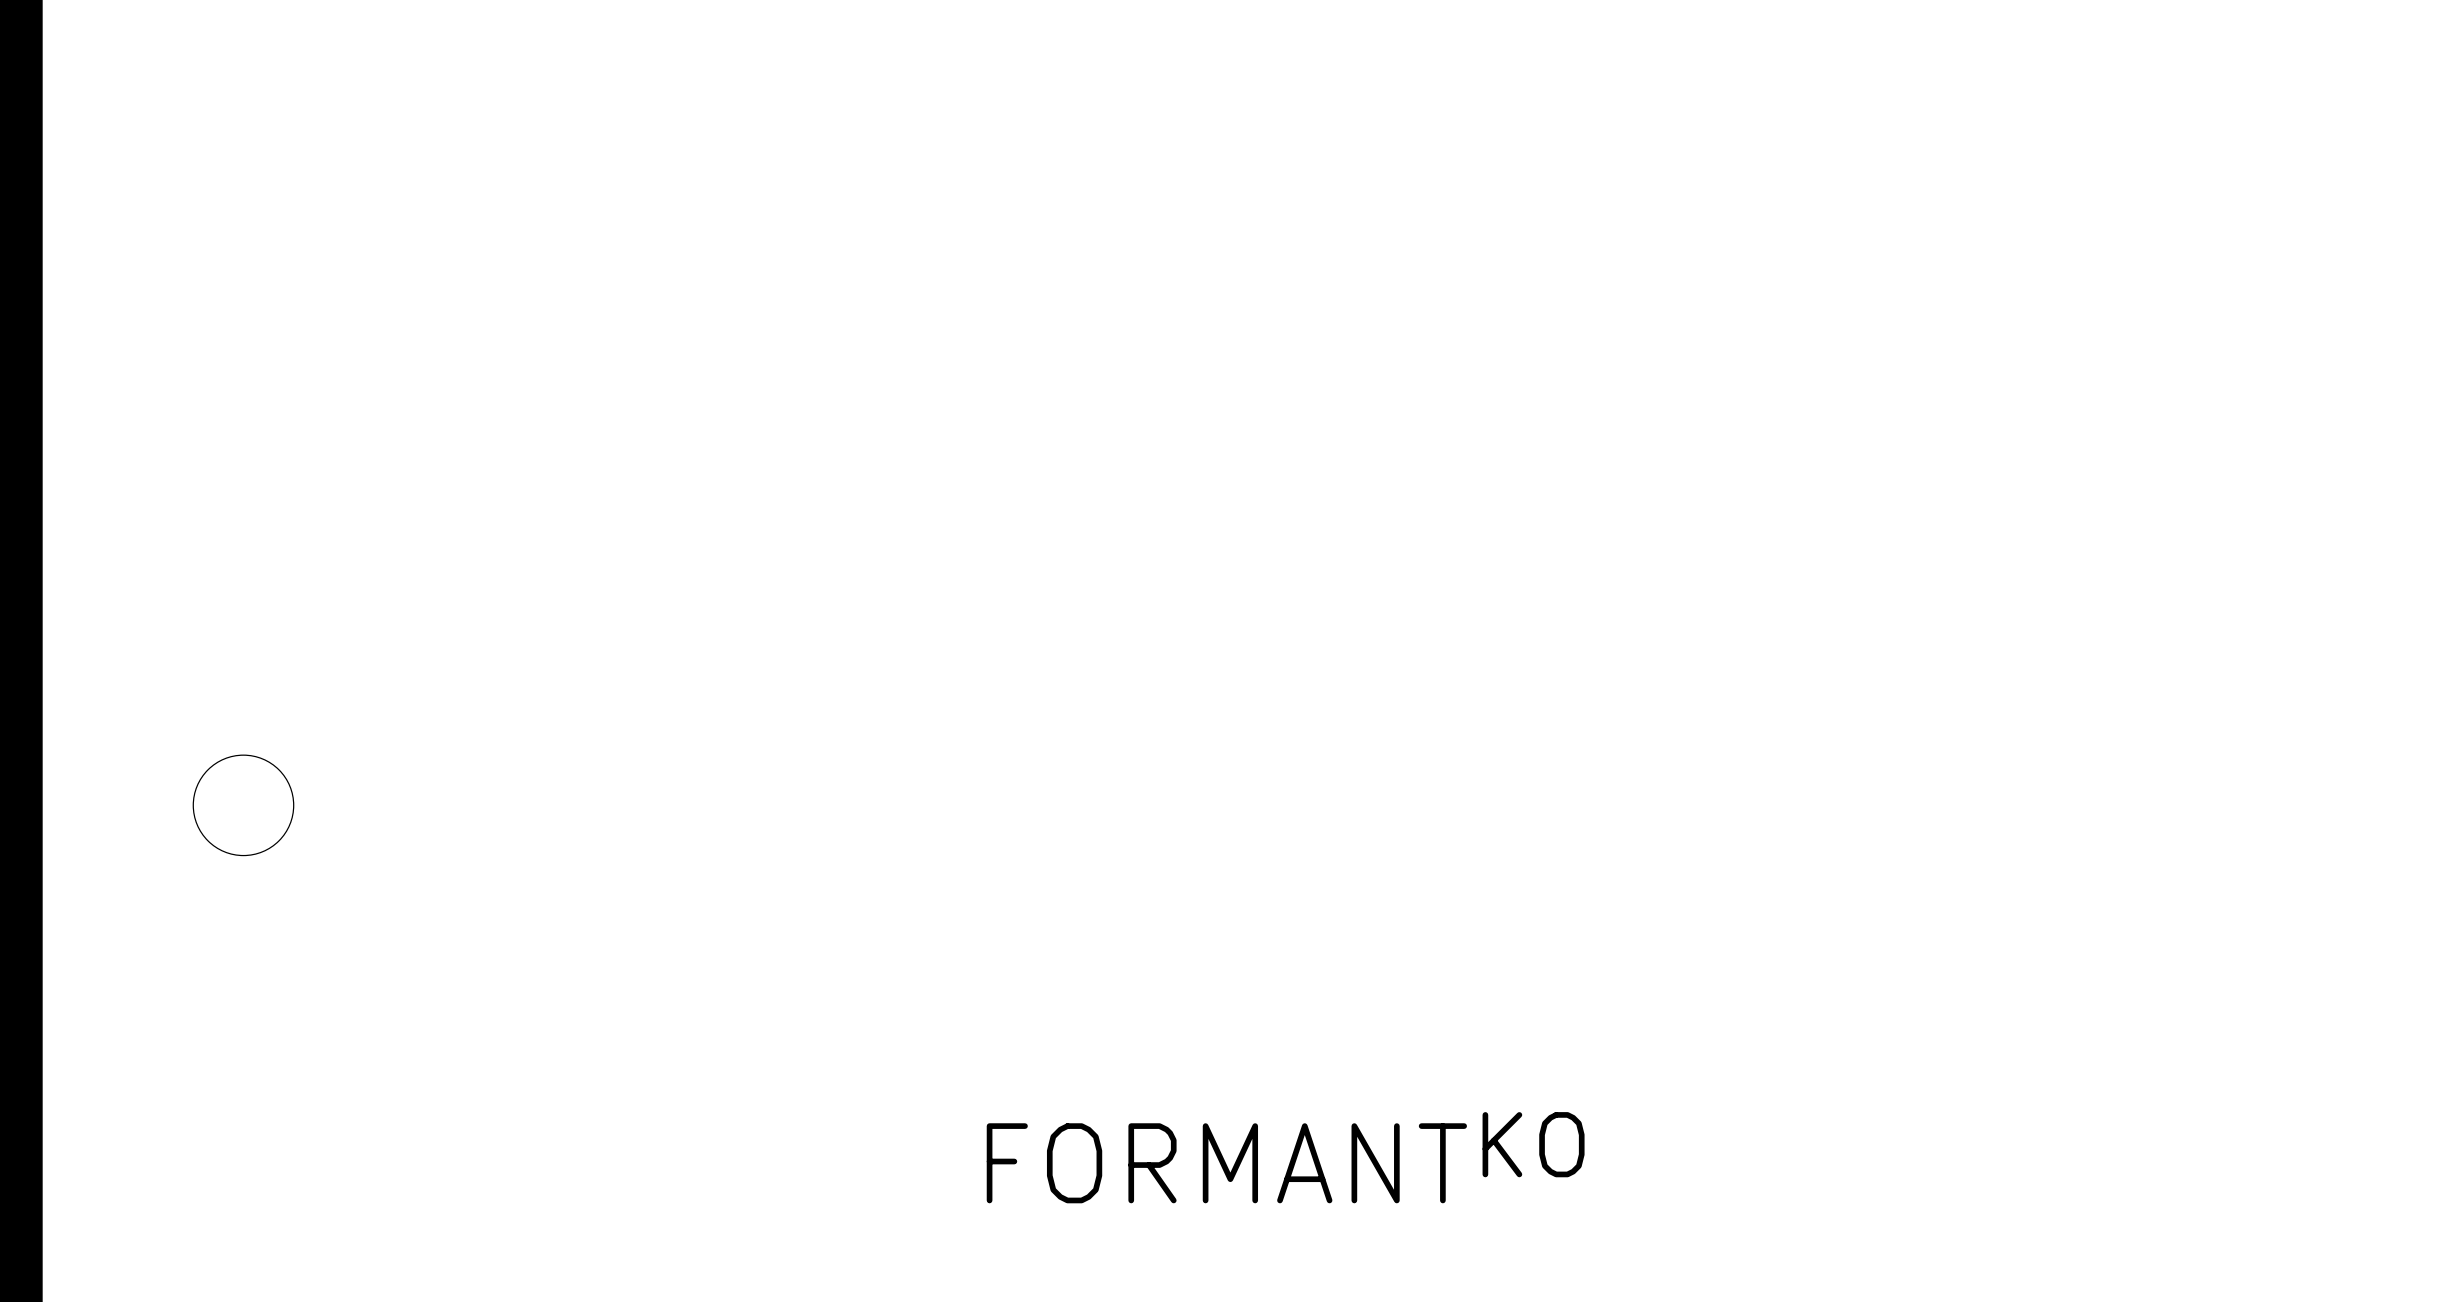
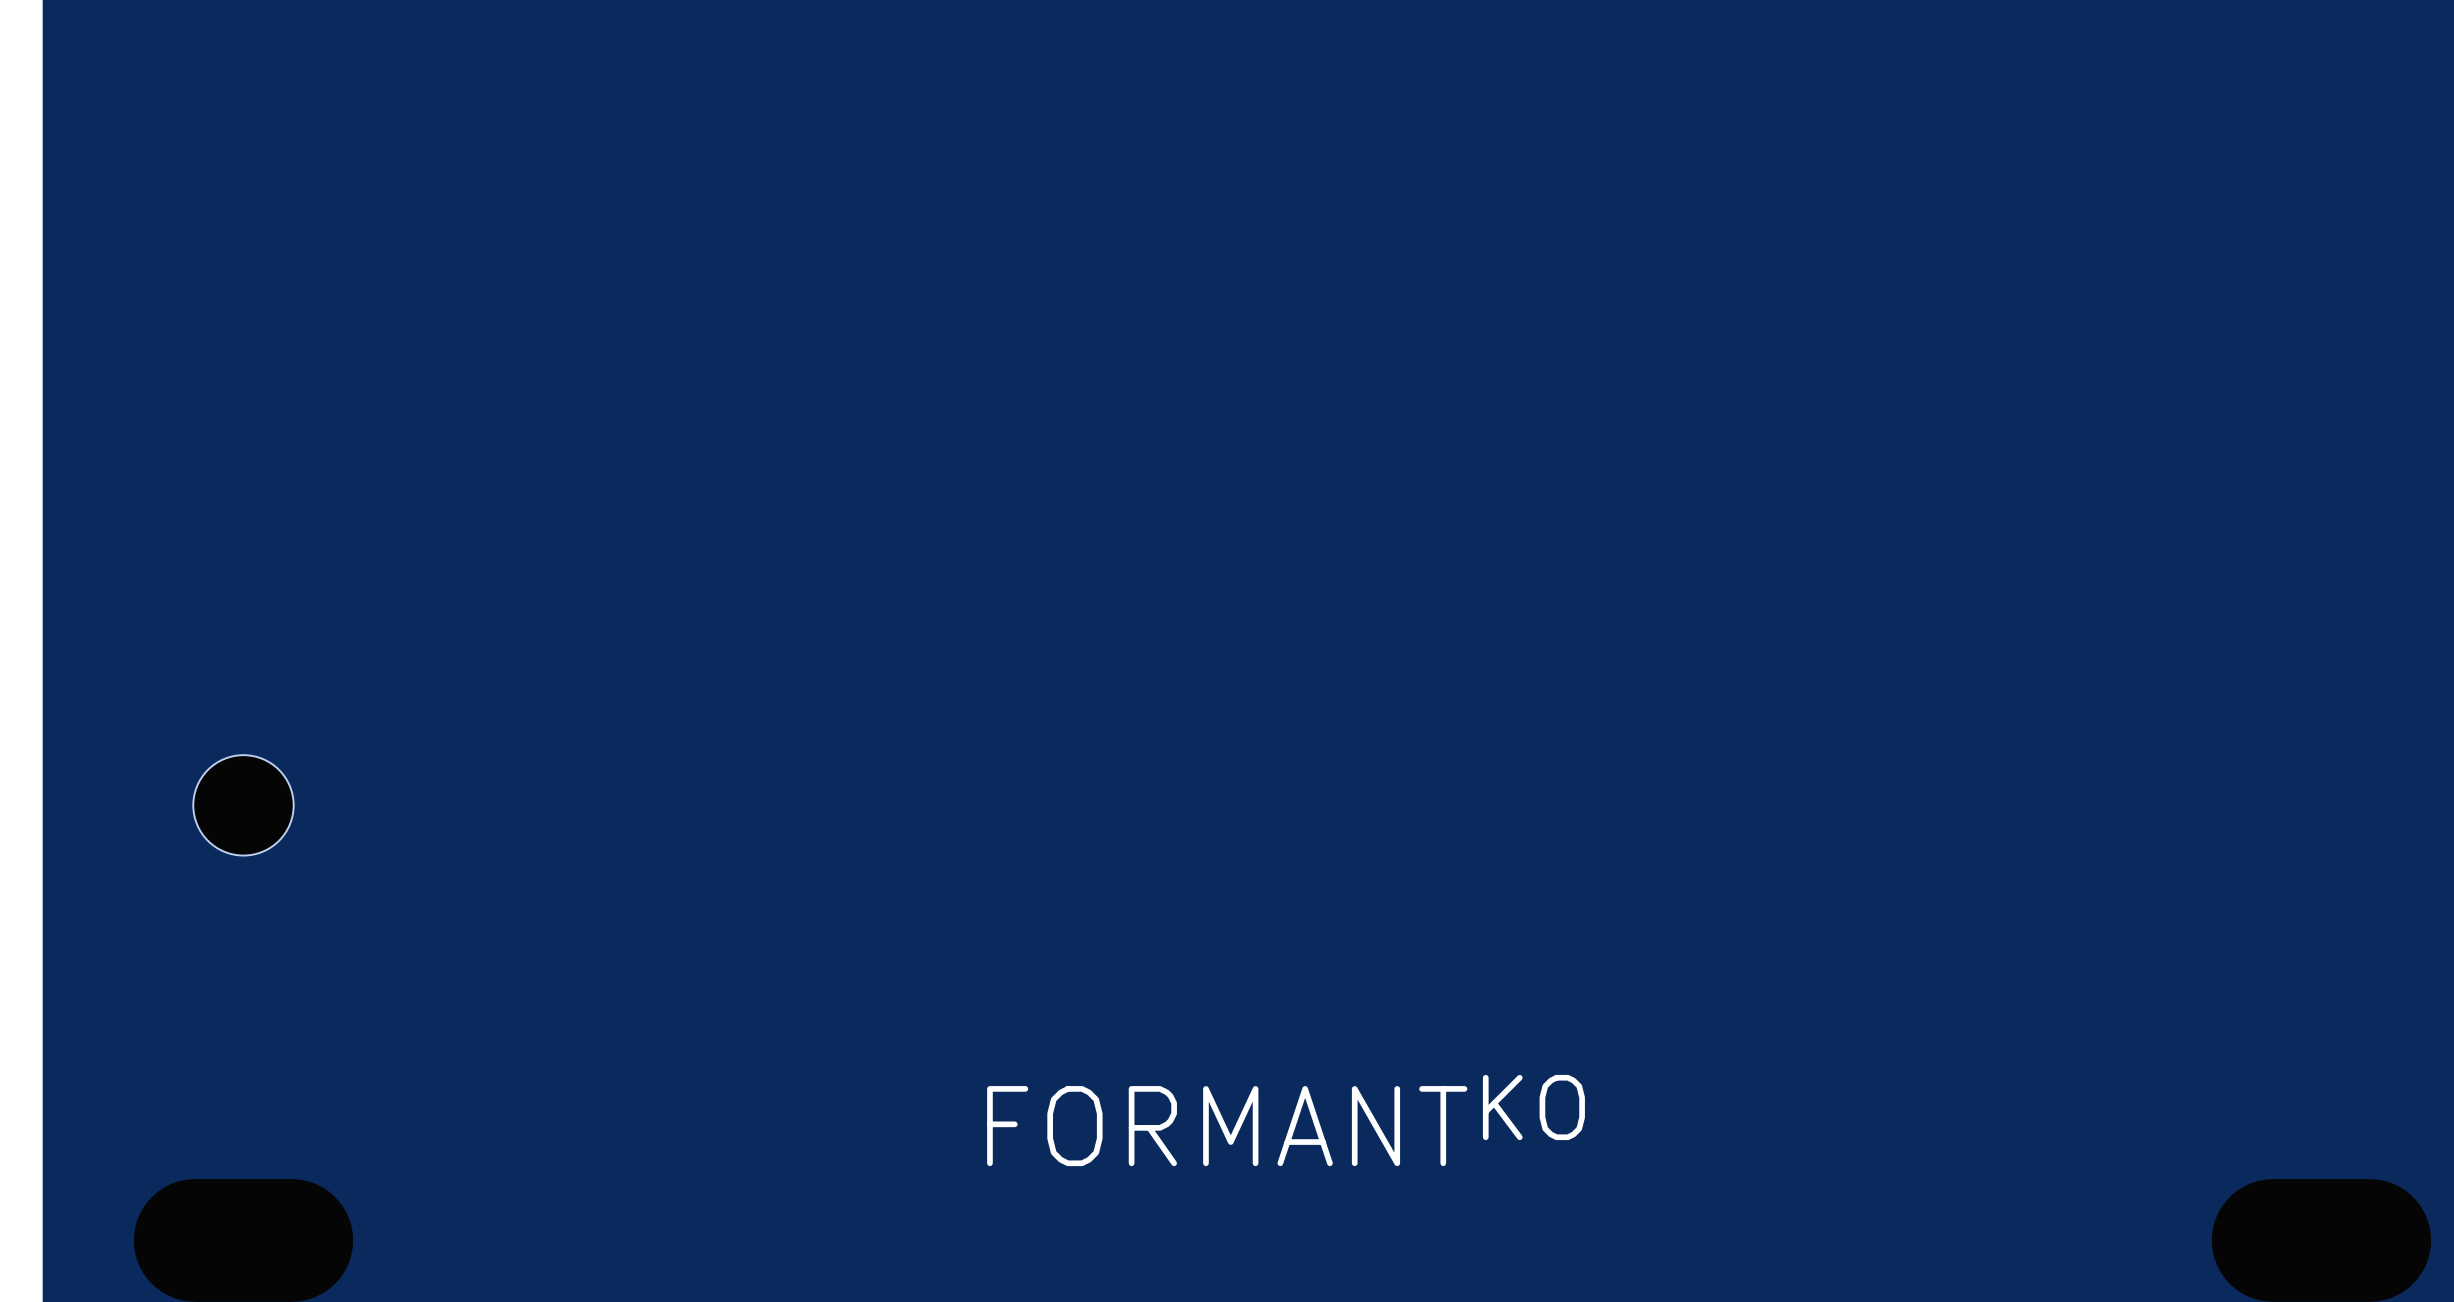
text position: FORMANTKO (1285, 1157) -> FORMANTKO (1286, 1120)

